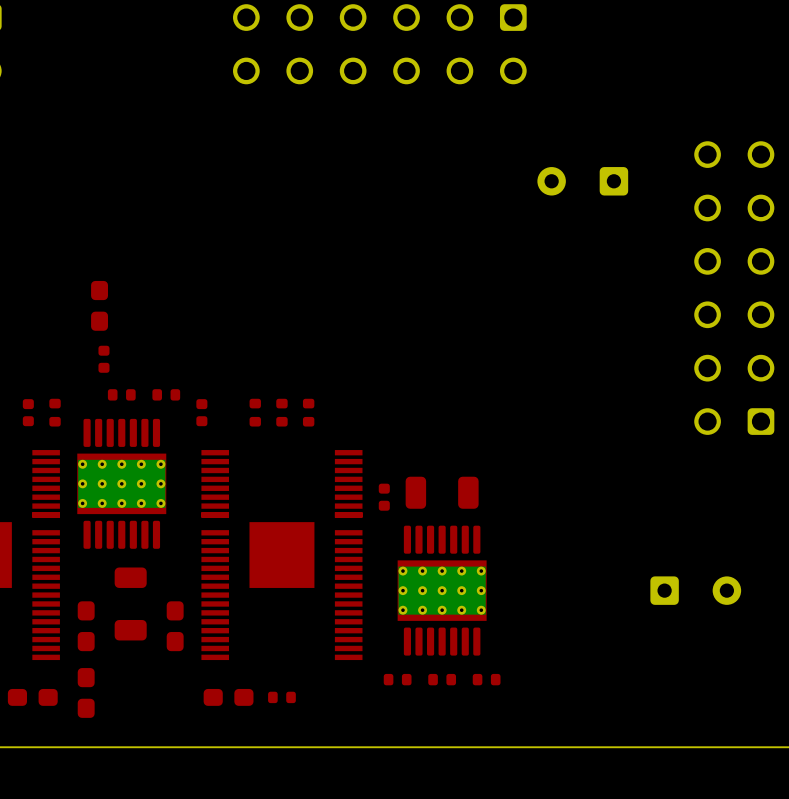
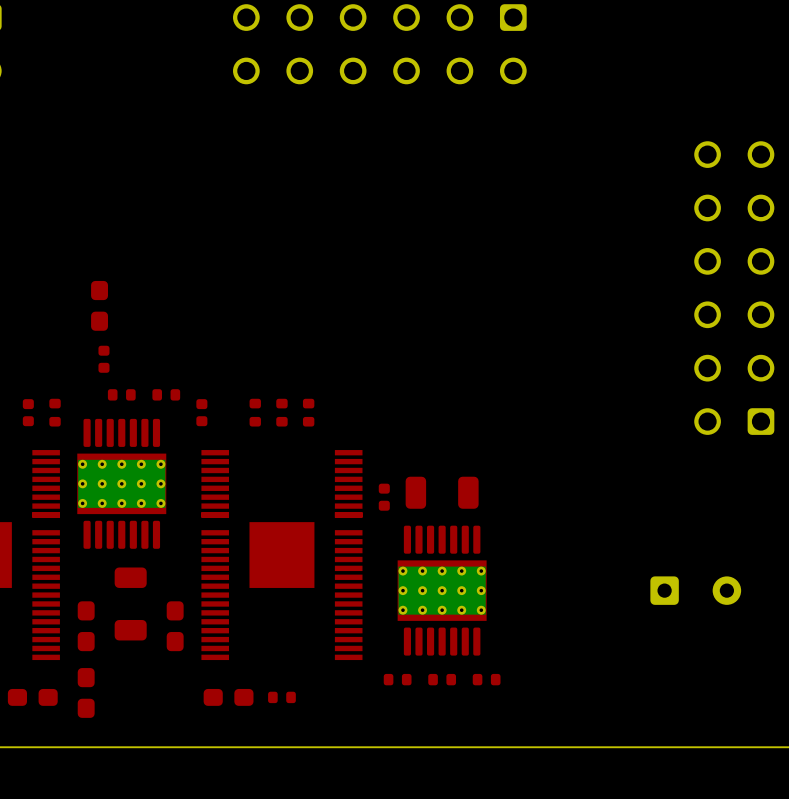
part: (582, 181) -> none

